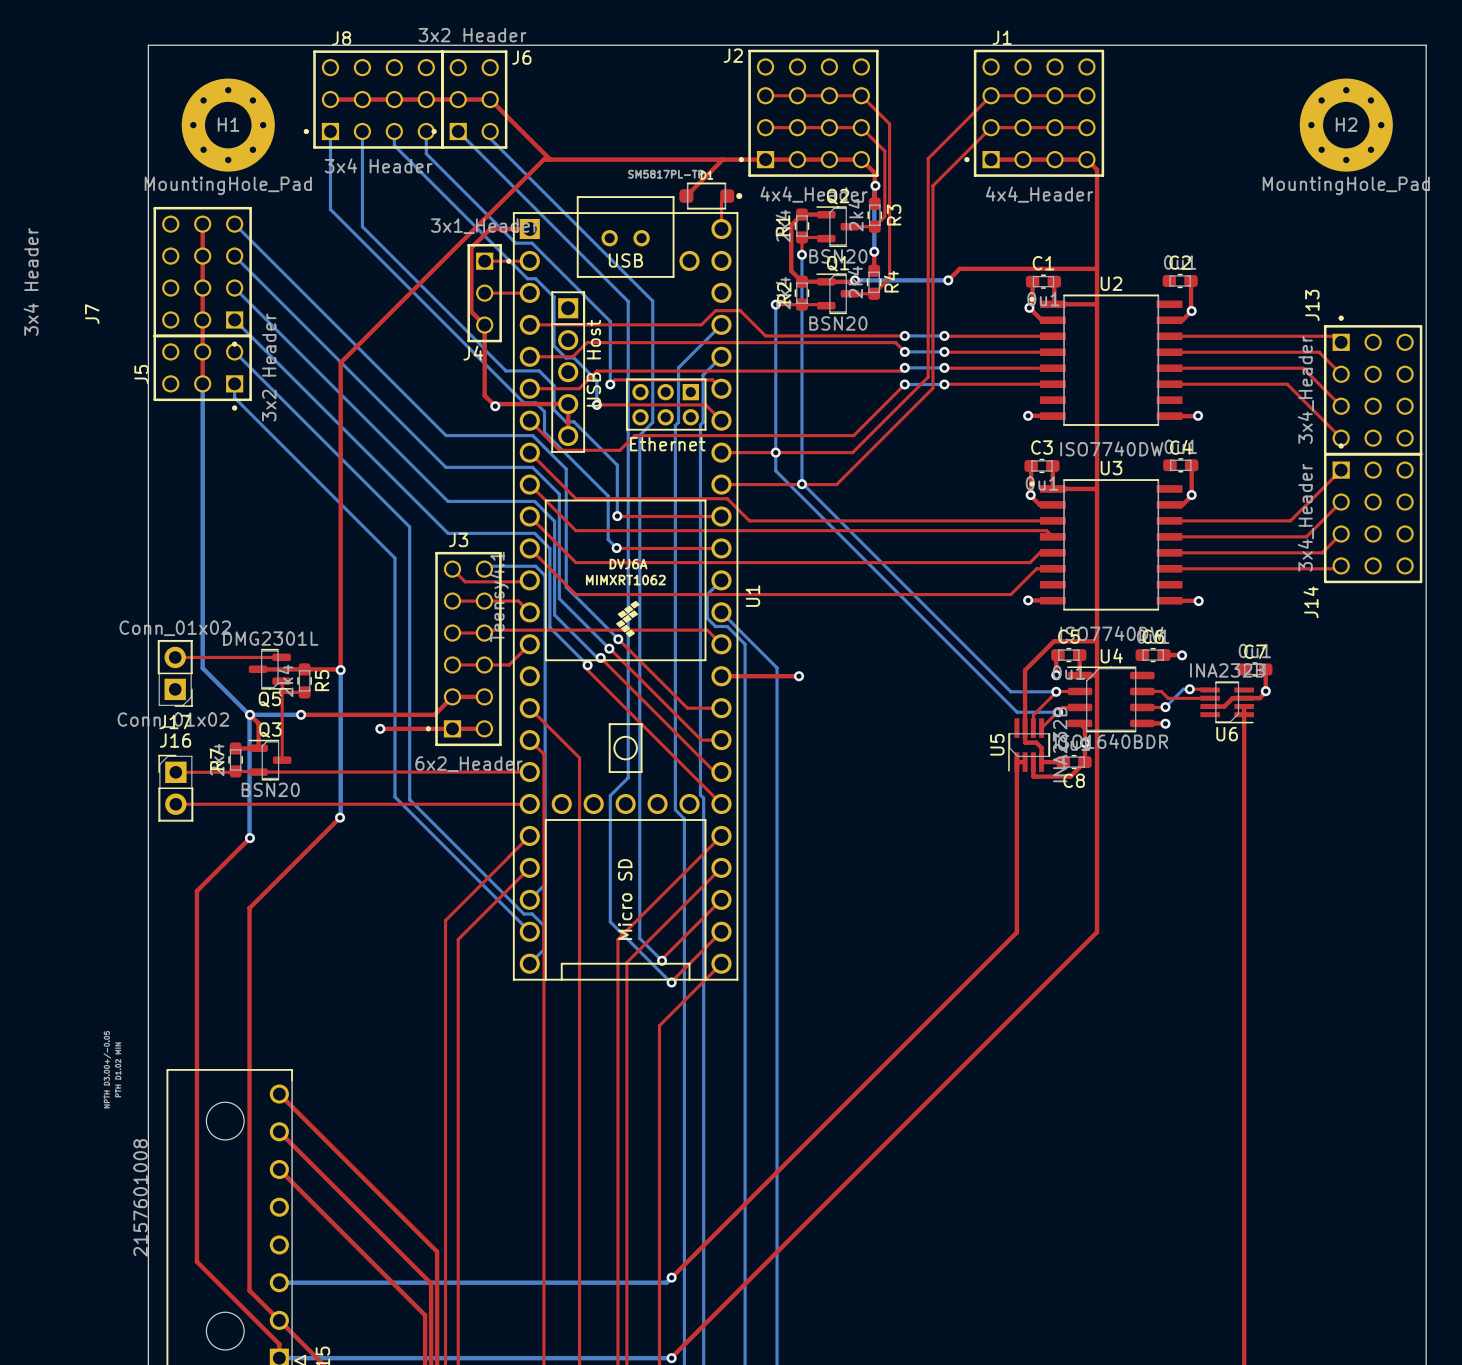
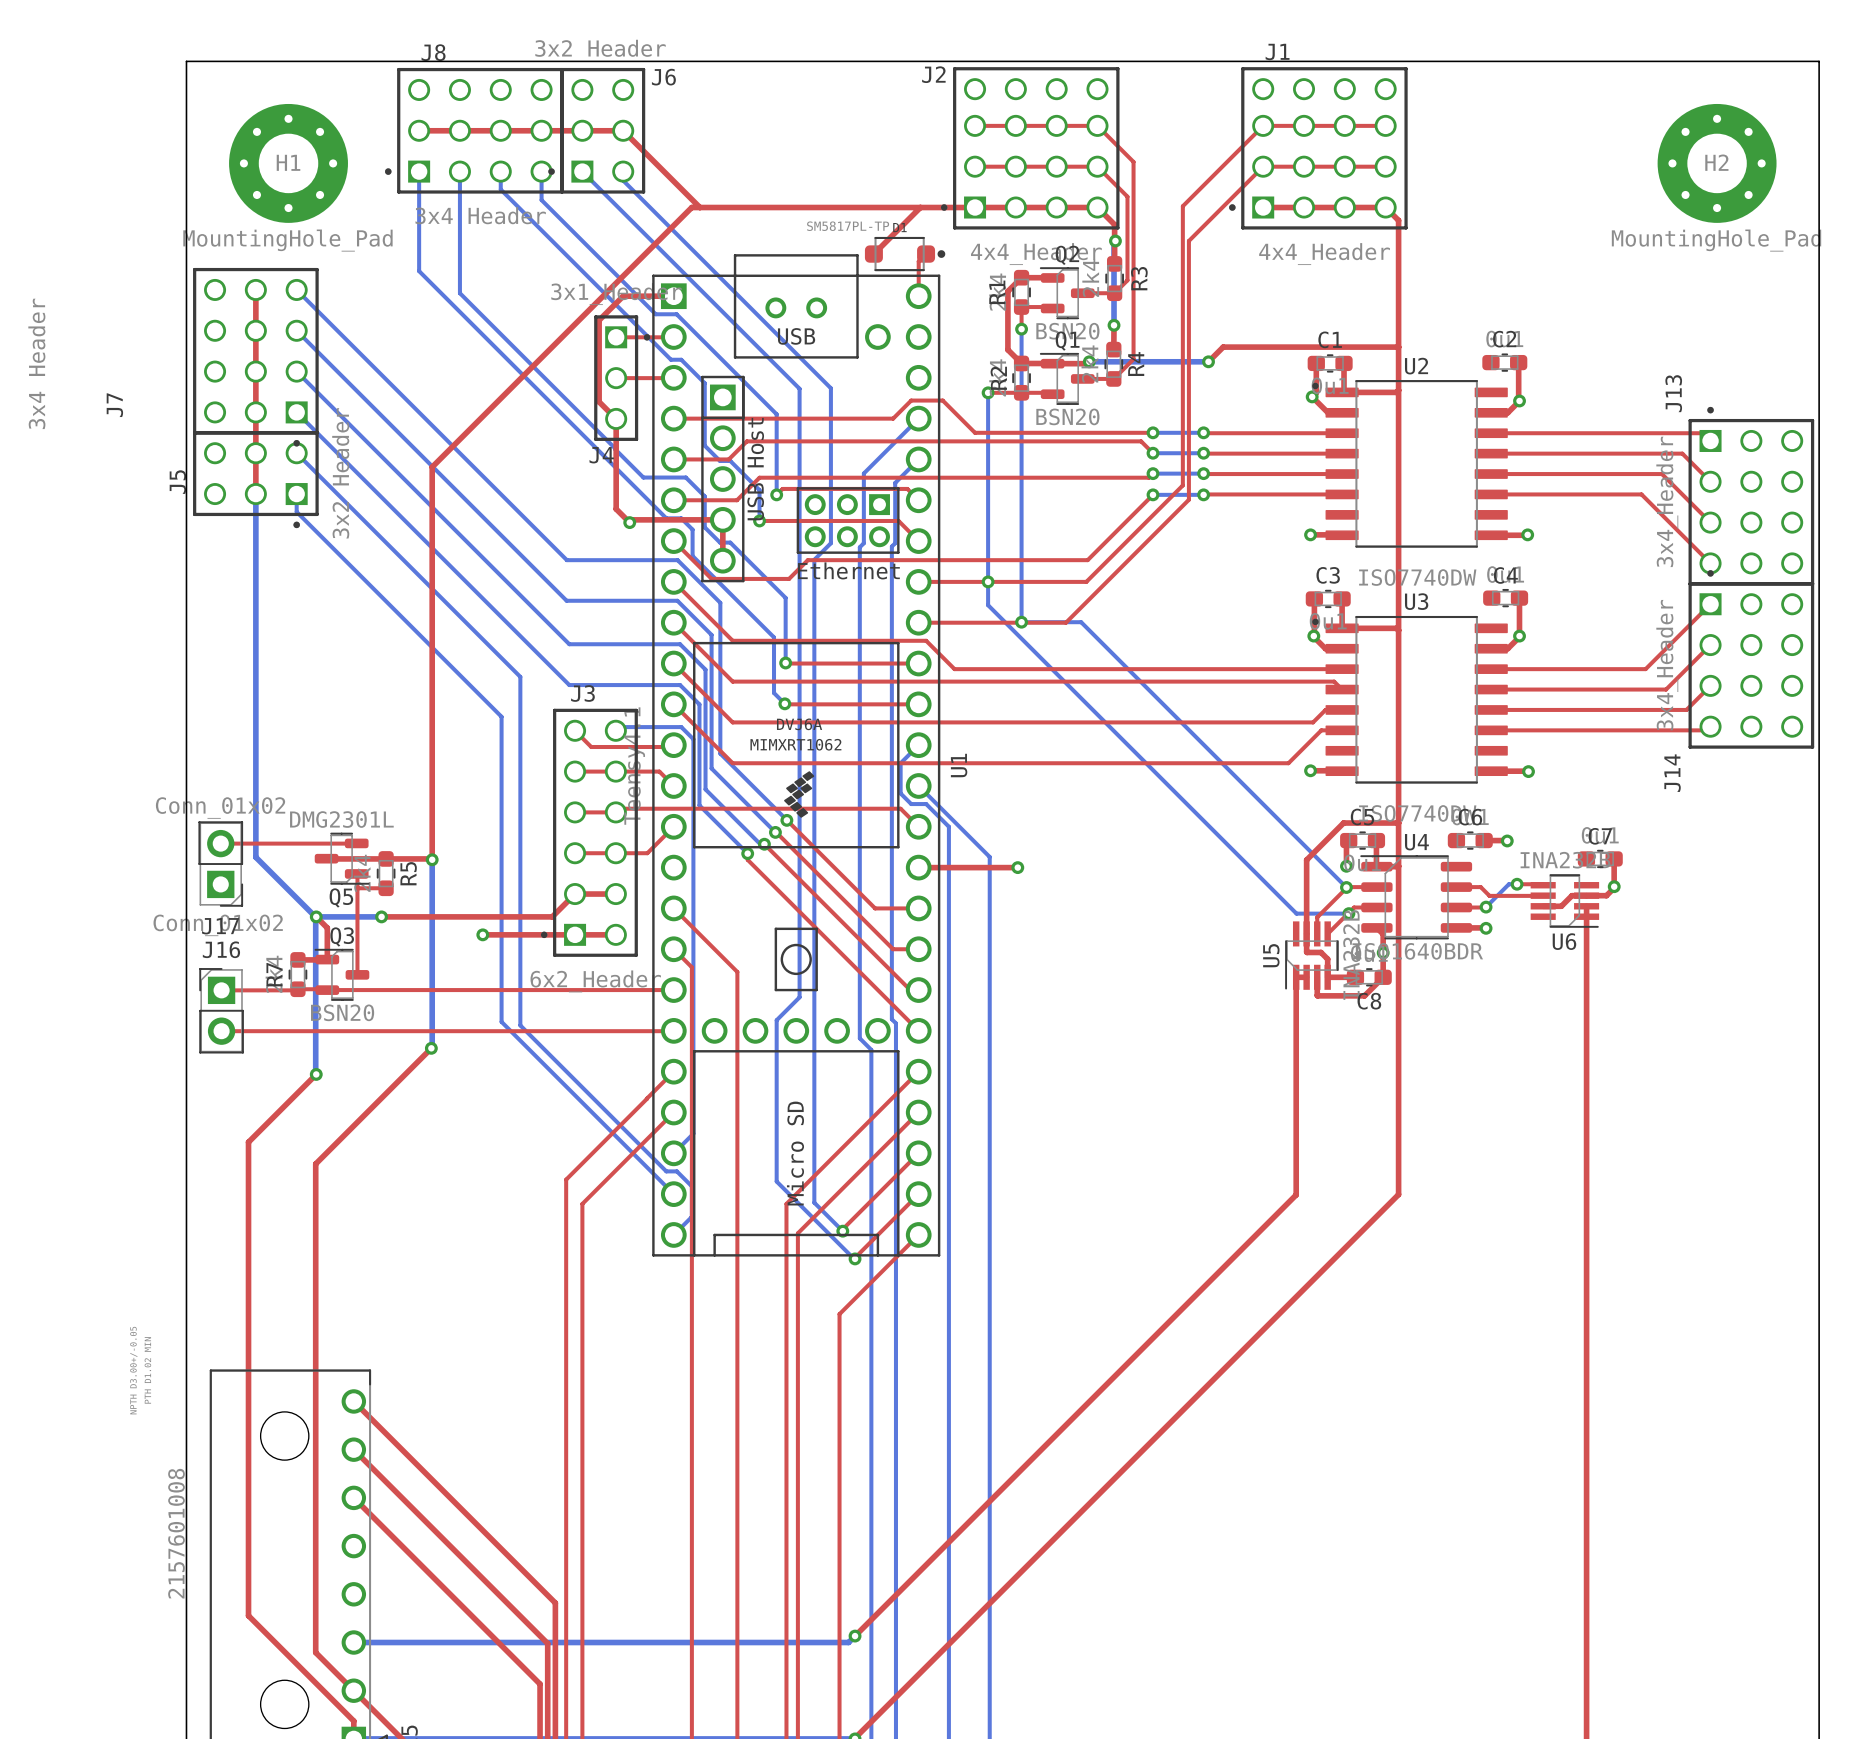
bottom track: (803, 484) (1010, 691) (1056, 691) -> (1023, 622) (1081, 622) (1346, 887)

